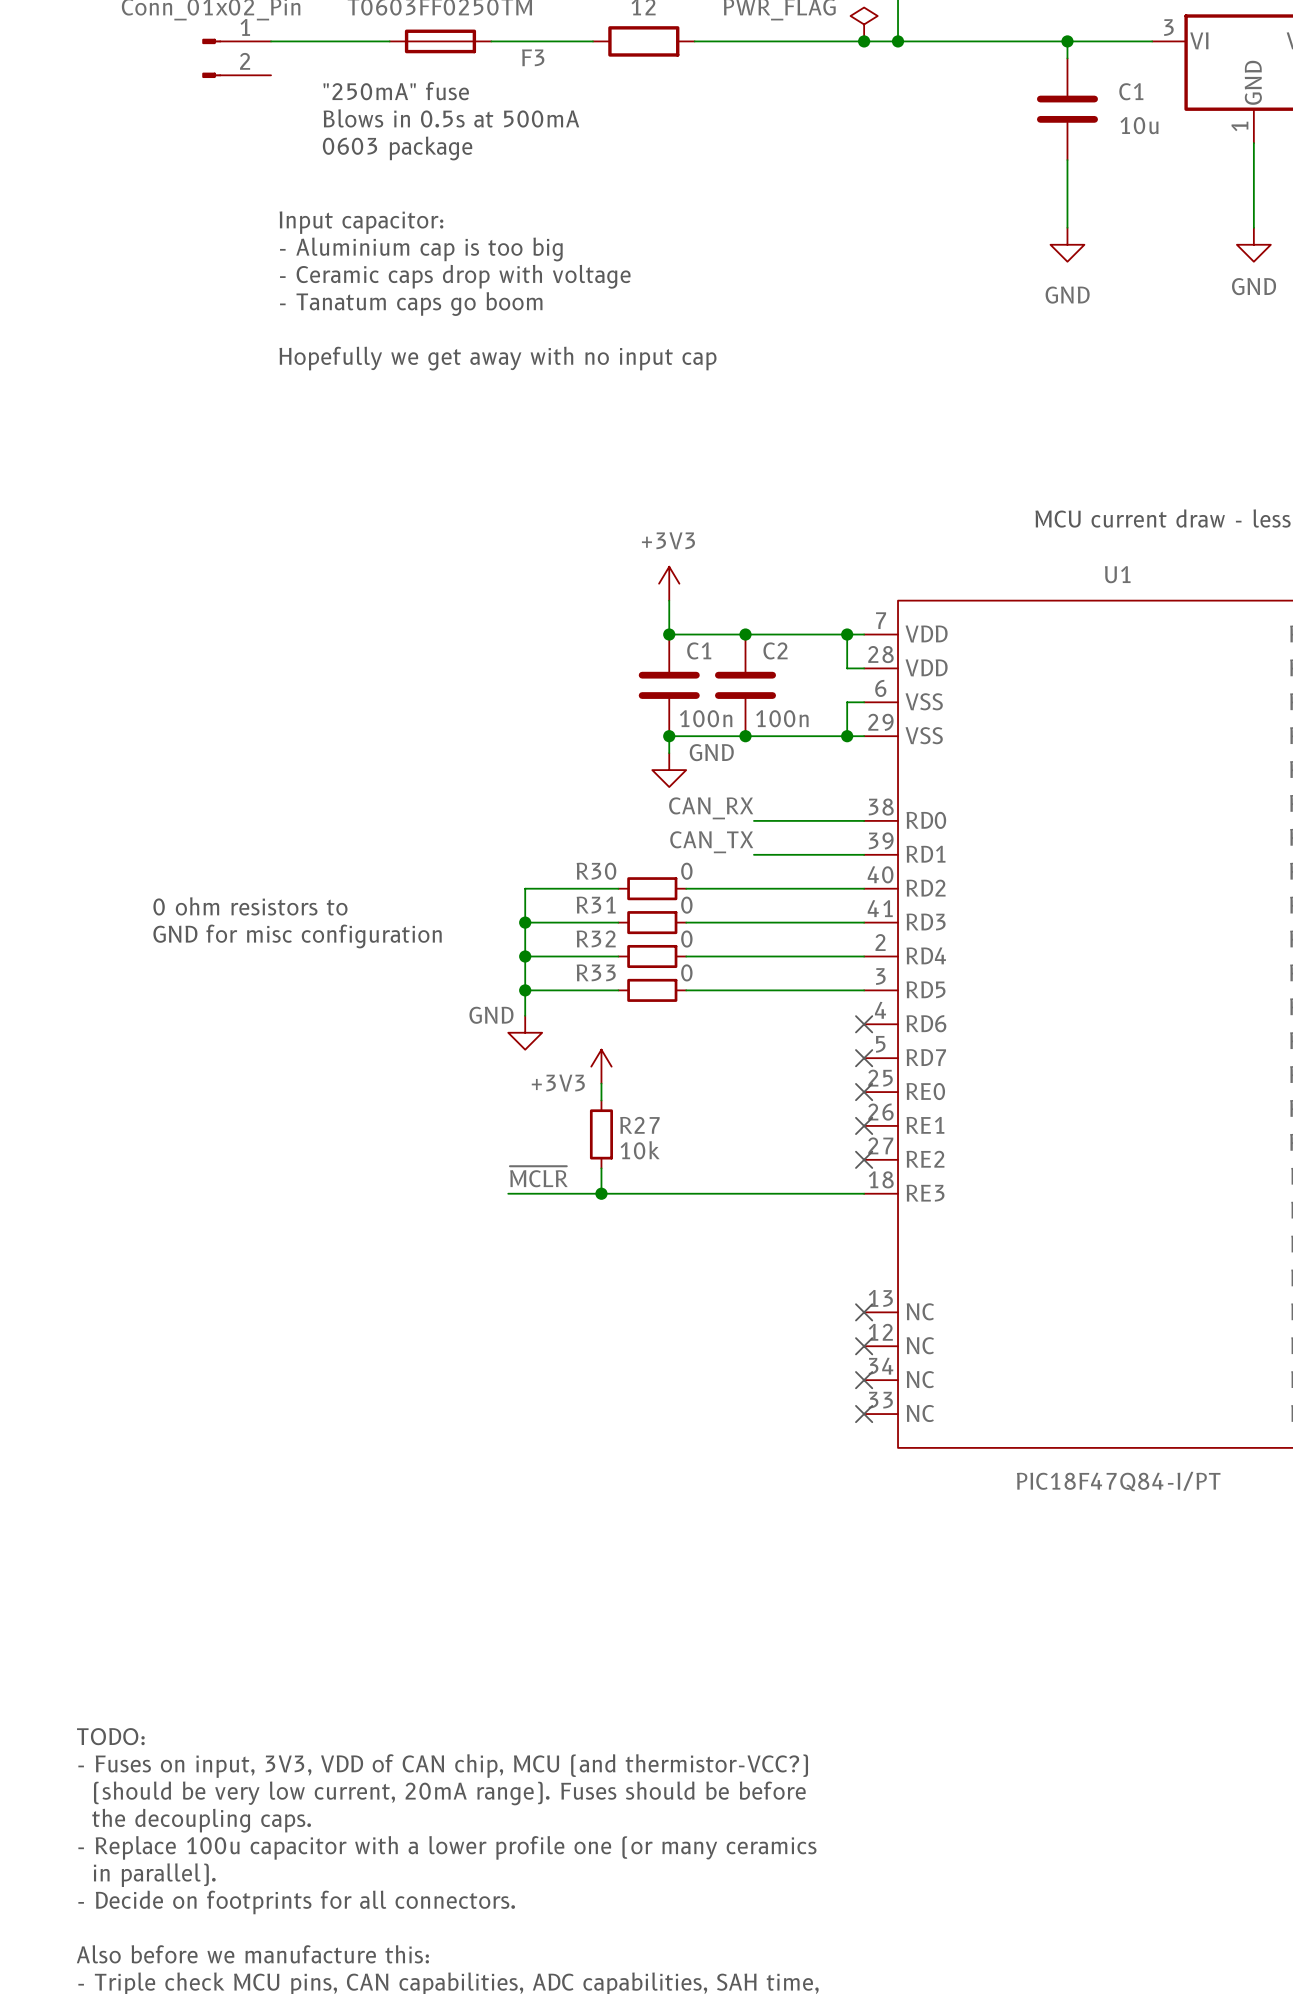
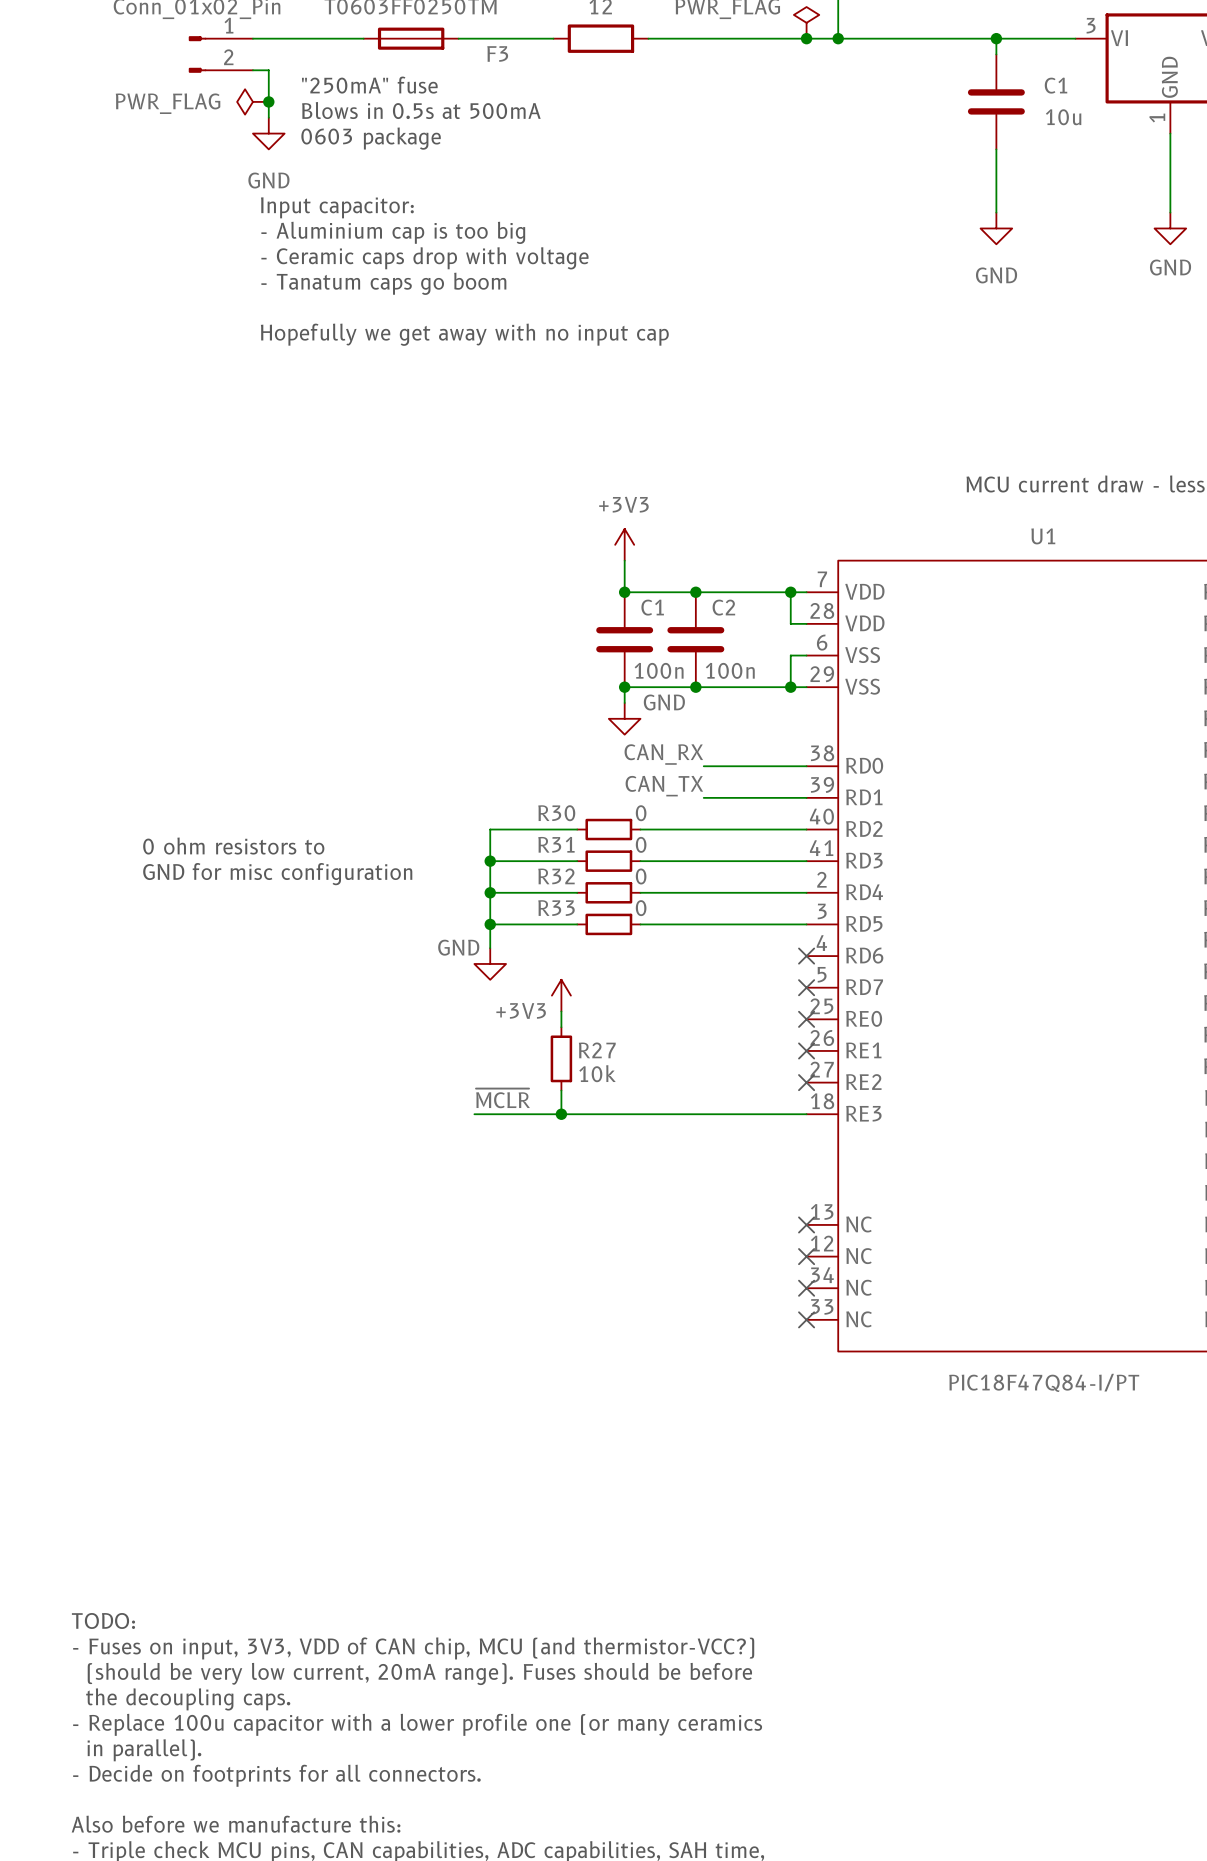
wire: none -> (252, 70) (268, 70) (268, 117)
power symbol: none -> PWR_FLAG (252, 101)
junction: none -> (268, 101)
power symbol: none -> GND (268, 133)

